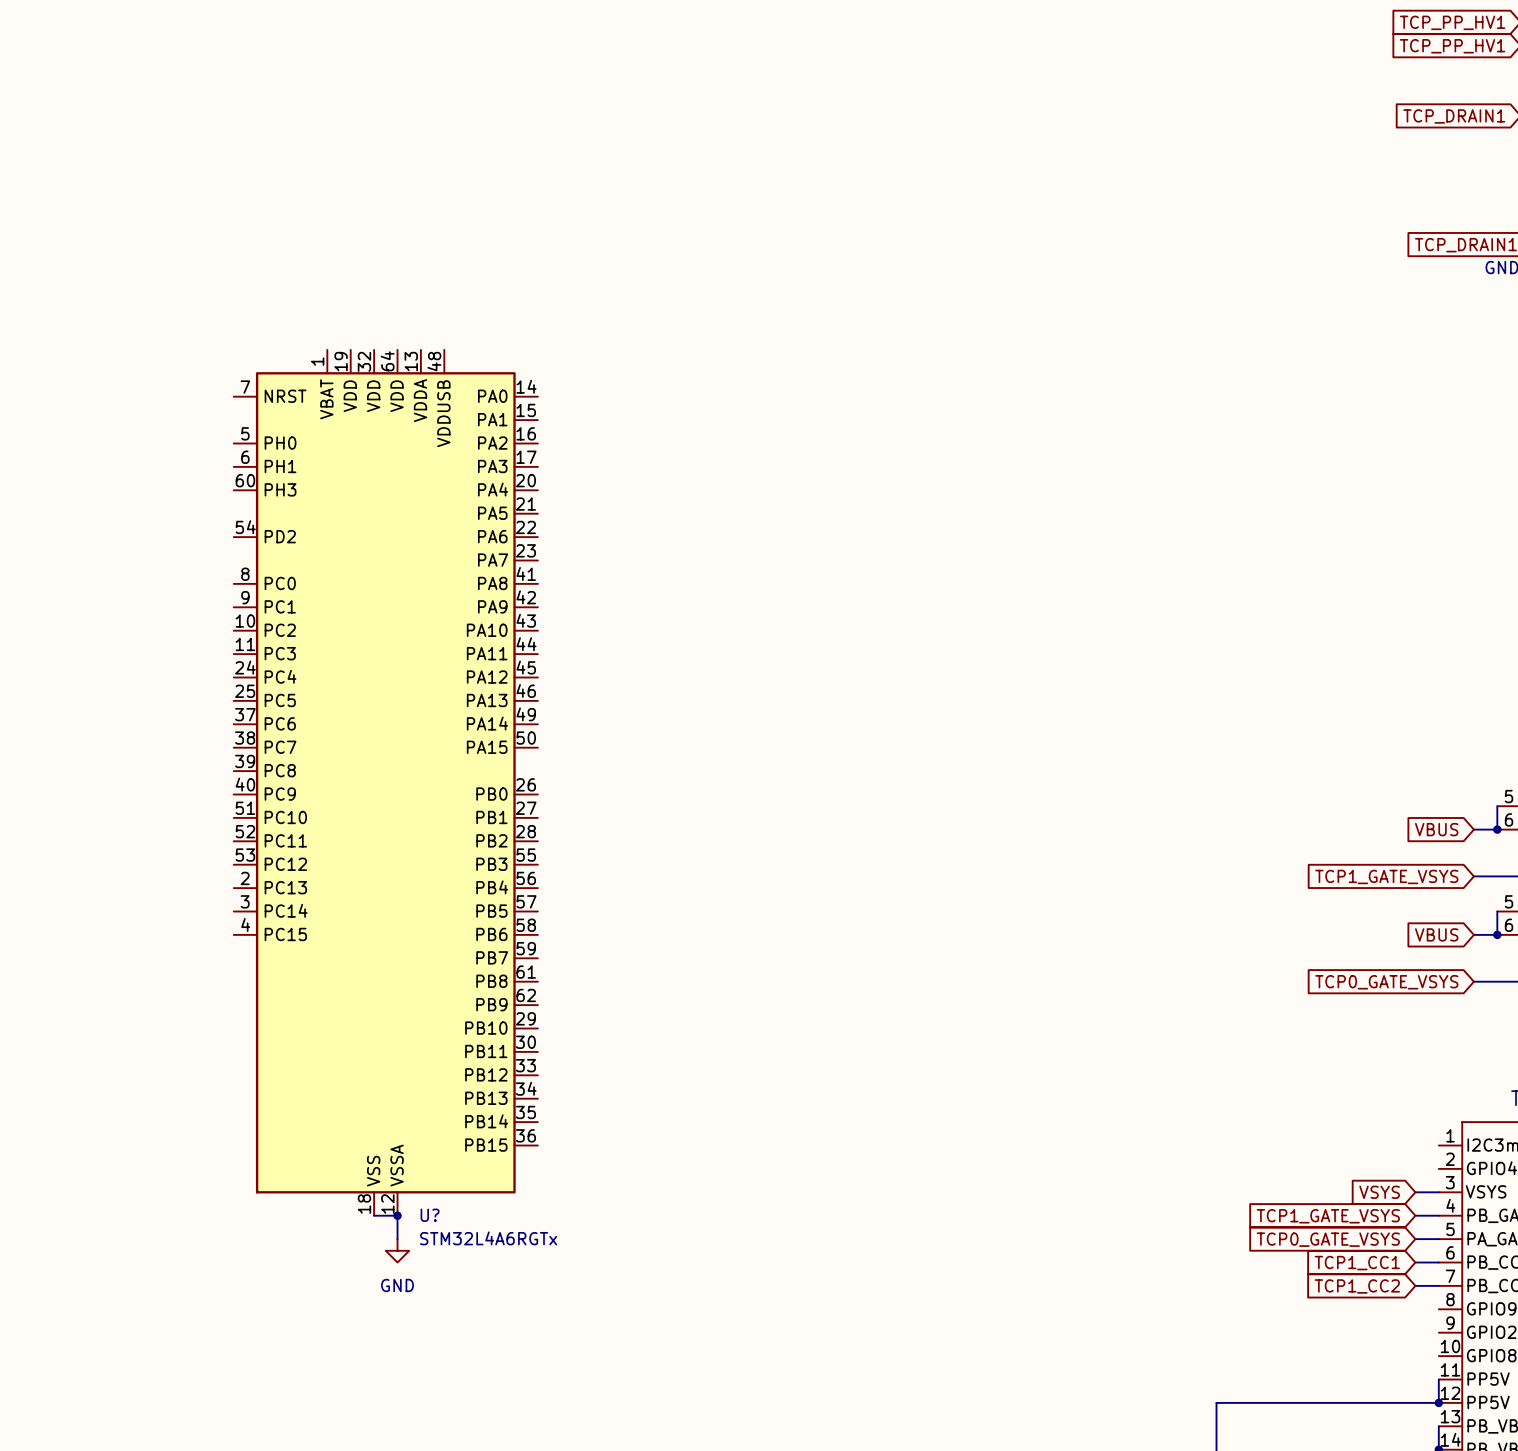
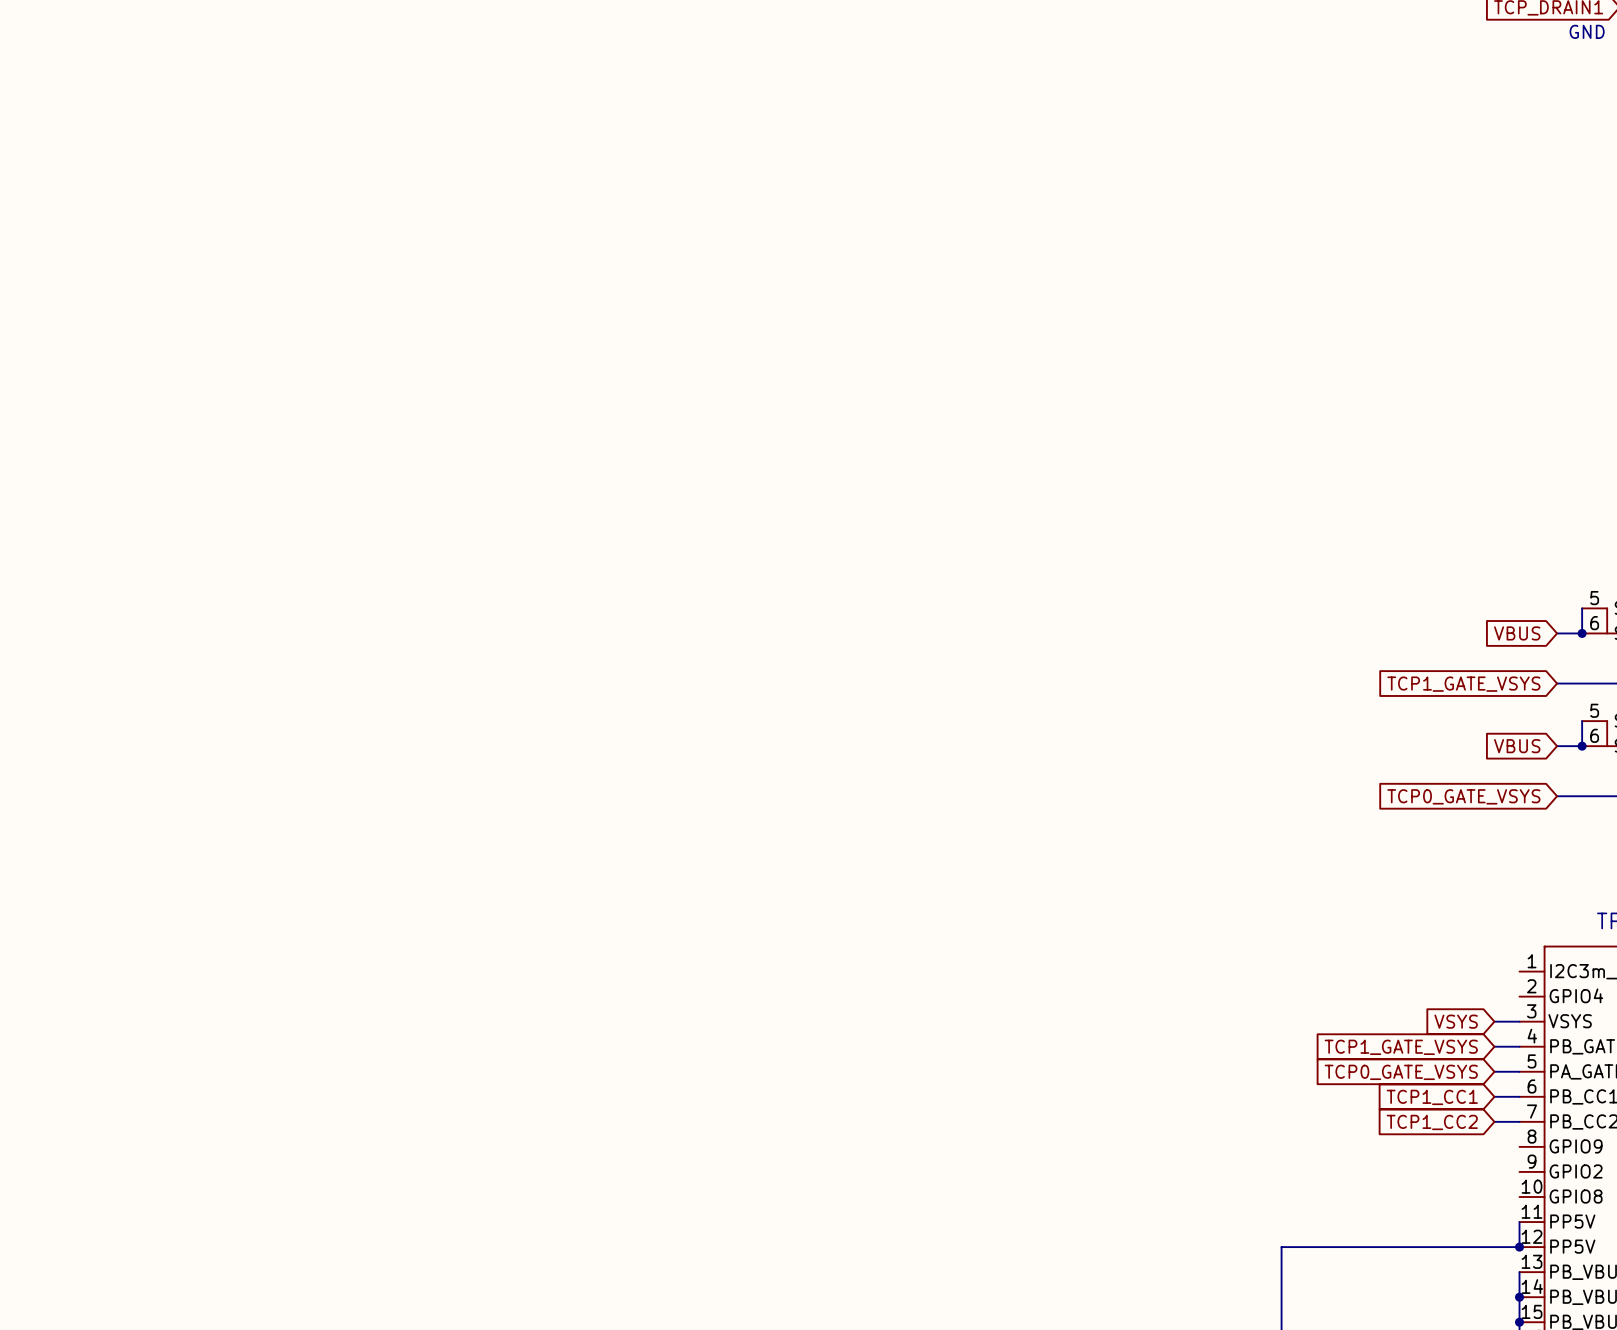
U?: STM32L4A6RGTx (385, 782) -> none
wire: (374, 1215) (397, 1215) (397, 1239) -> none
junction: (397, 1215) -> none
power symbol: GND (397, 1250) -> none

